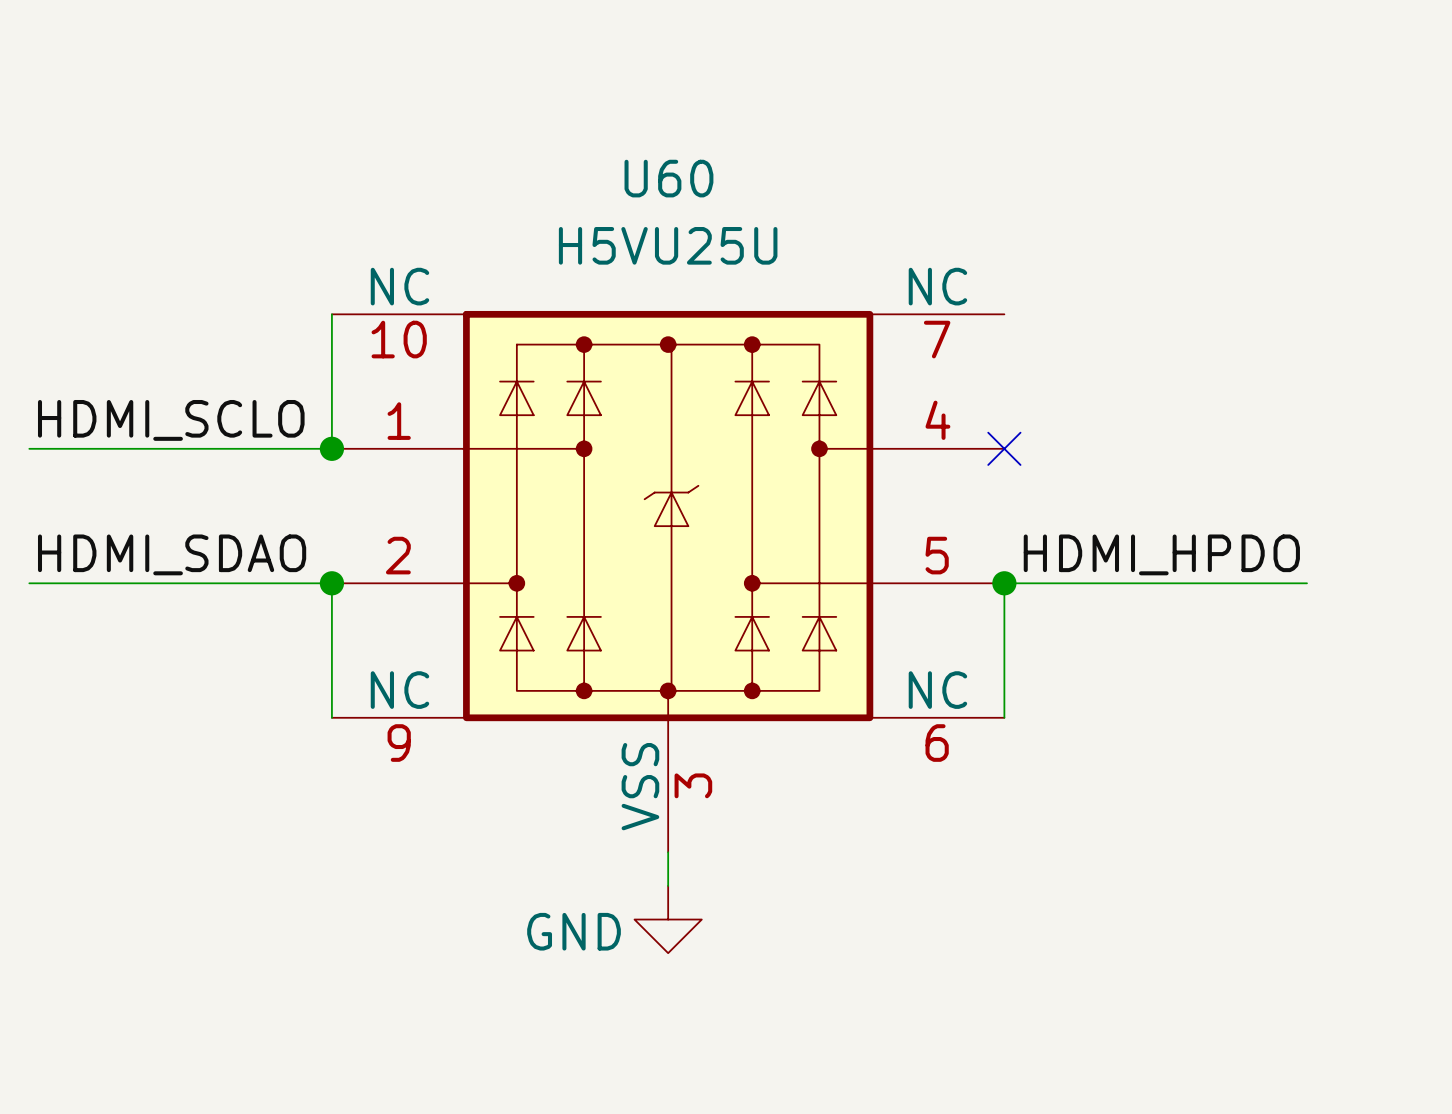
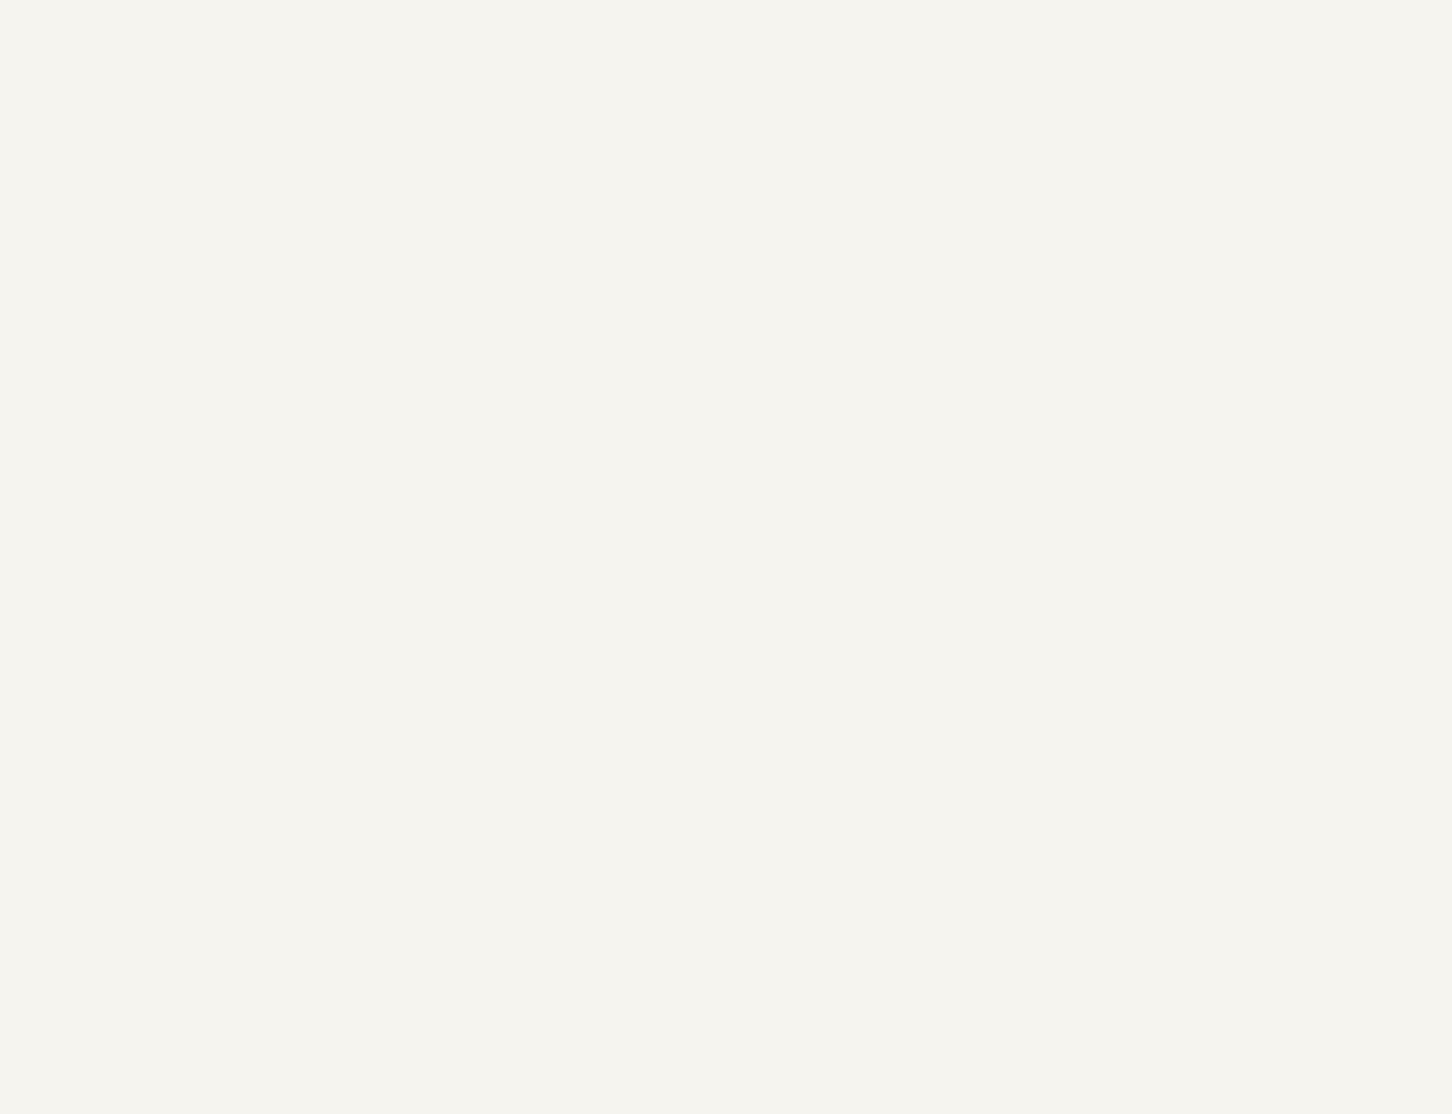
wire: (331, 314) (331, 448) (29, 448) -> none
label: HDMI_SCLO (171, 420) -> none
junction: (331, 448) -> none
no-connect mark: (1004, 448) -> none
label: HDMI_SDAO (172, 554) -> none
label: HDMI_HPDO (1161, 554) -> none
U60: H5VU25U (668, 581) -> none
wire: (29, 583) (331, 583) (331, 717) -> none
junction: (331, 583) -> none
junction: (1004, 583) -> none
wire: (1306, 583) (1004, 583) (1004, 717) -> none
wire: (668, 852) (668, 885) -> none
power symbol: GND (668, 919) -> none

